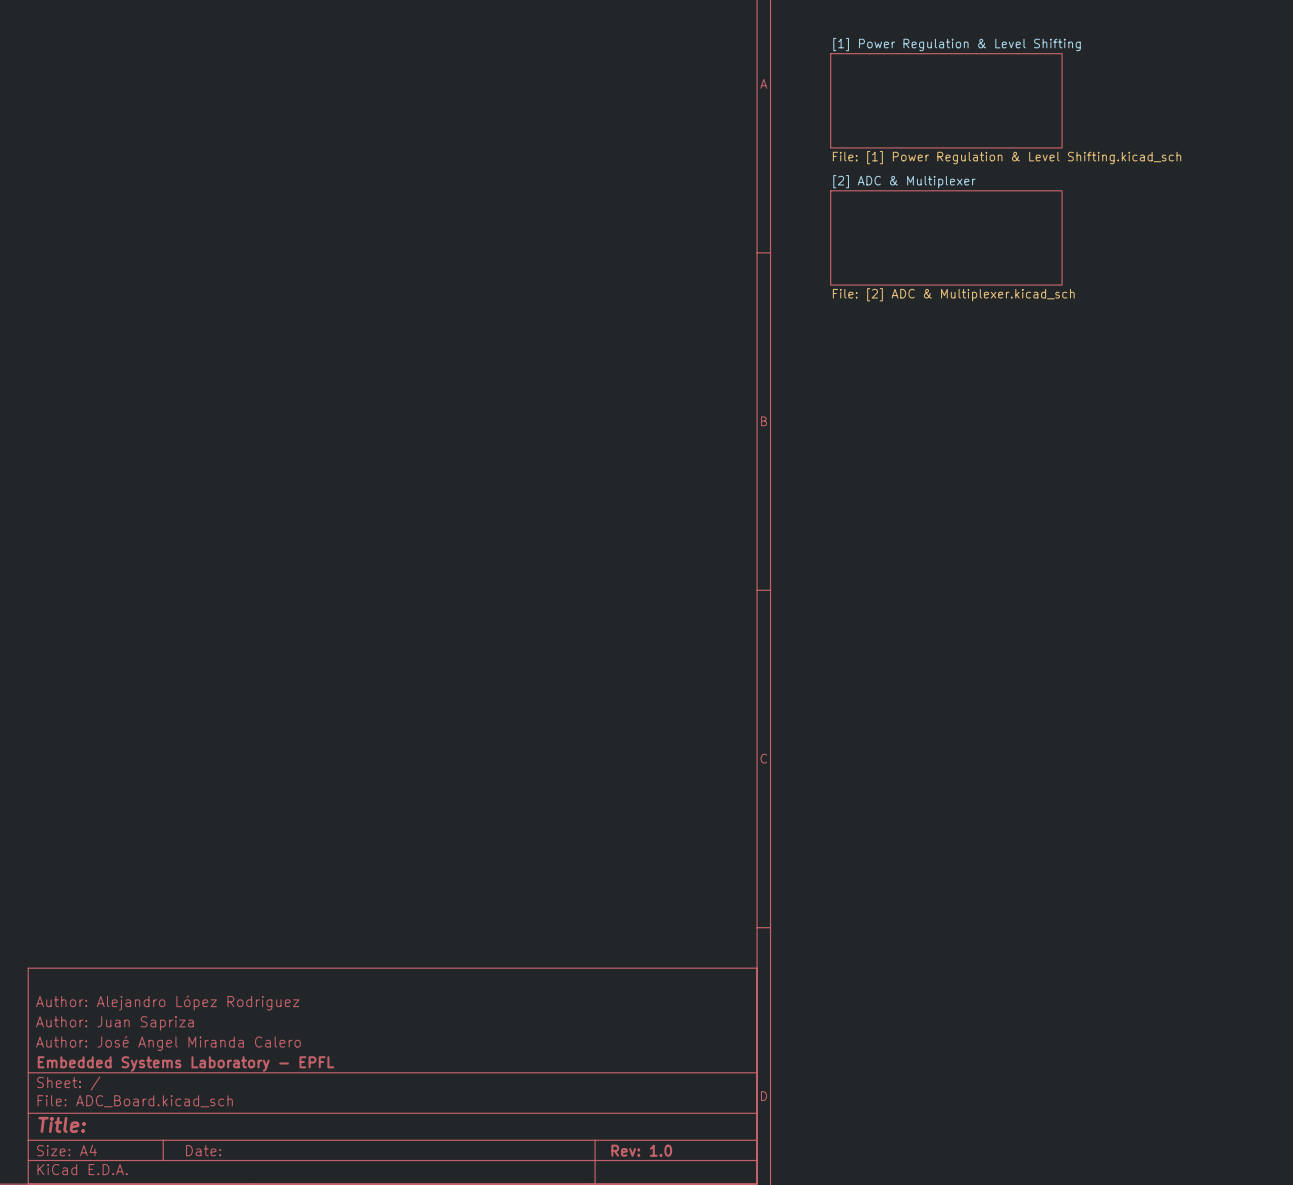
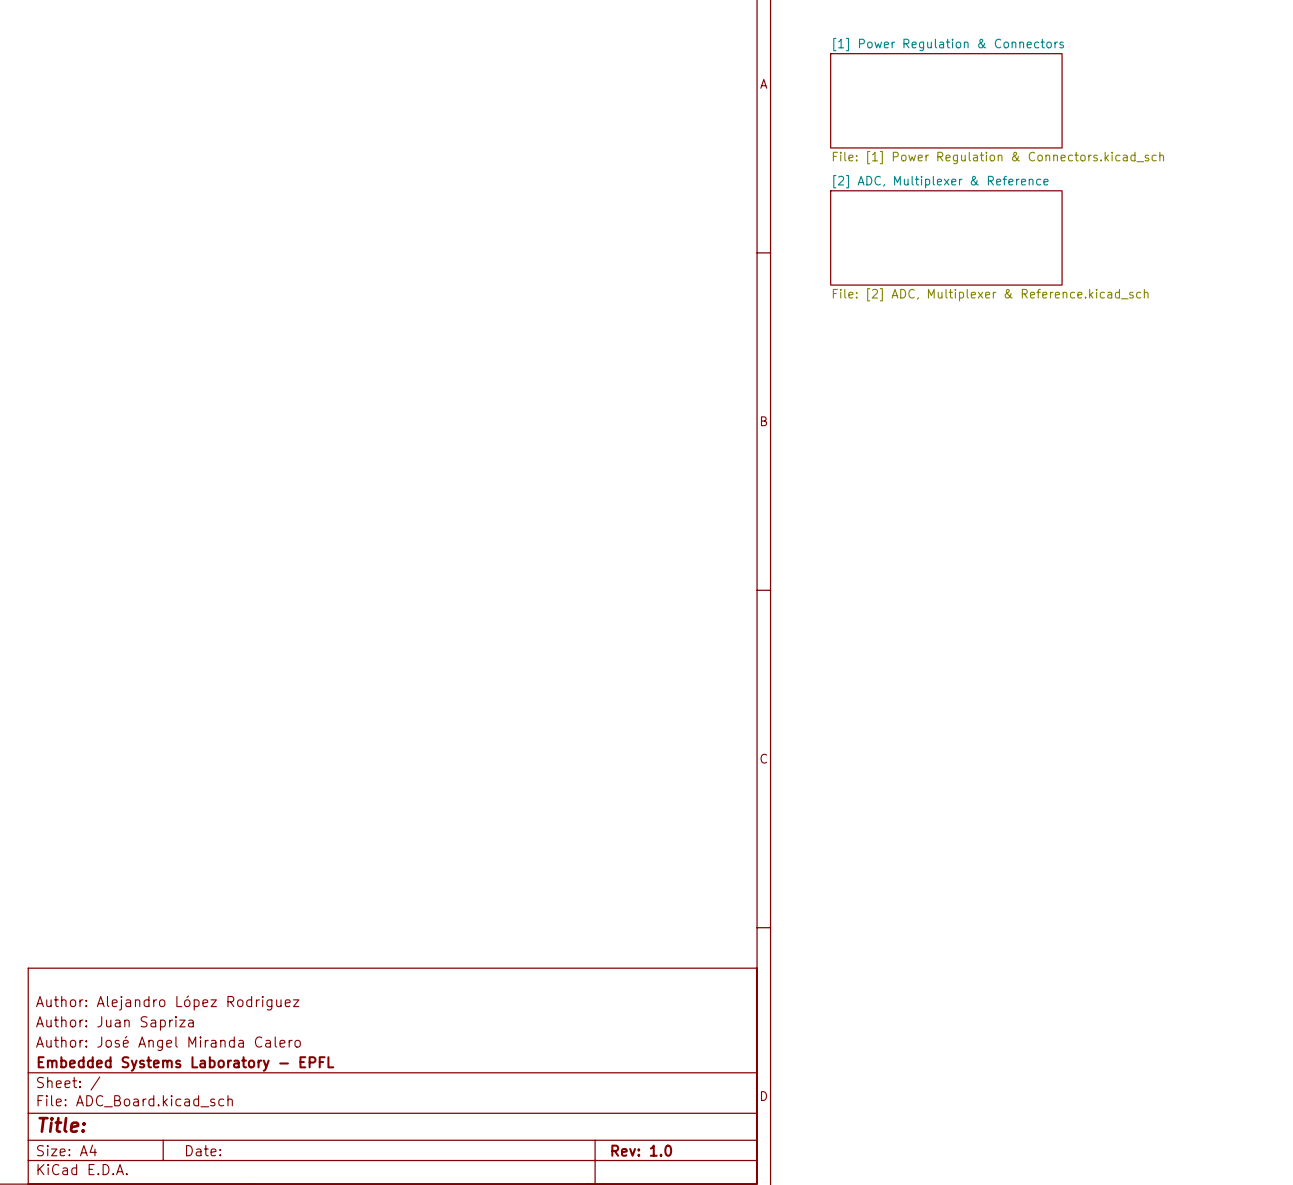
sheet [1] Power Regulation & Level Shifting name: [1] Power Regulation & Level Shifting (957, 44) -> [1] Power Regulation & Connectors (948, 44)
sheet [1] Power Regulation & Level Shifting value: File: [1] Power Regulation & Level Shifting.kicad_sch (1007, 157) -> File: [1] Power Regulation & Connectors.kicad_sch (998, 157)
sheet [2] ADC & Multiplexer name: [2] ADC & Multiplexer (904, 181) -> [2] ADC, Multiplexer & Reference (940, 181)
sheet [2] ADC & Multiplexer value: File: [2] ADC & Multiplexer.kicad_sch (953, 294) -> File: [2] ADC, Multiplexer & Reference.kicad_sch (990, 294)

